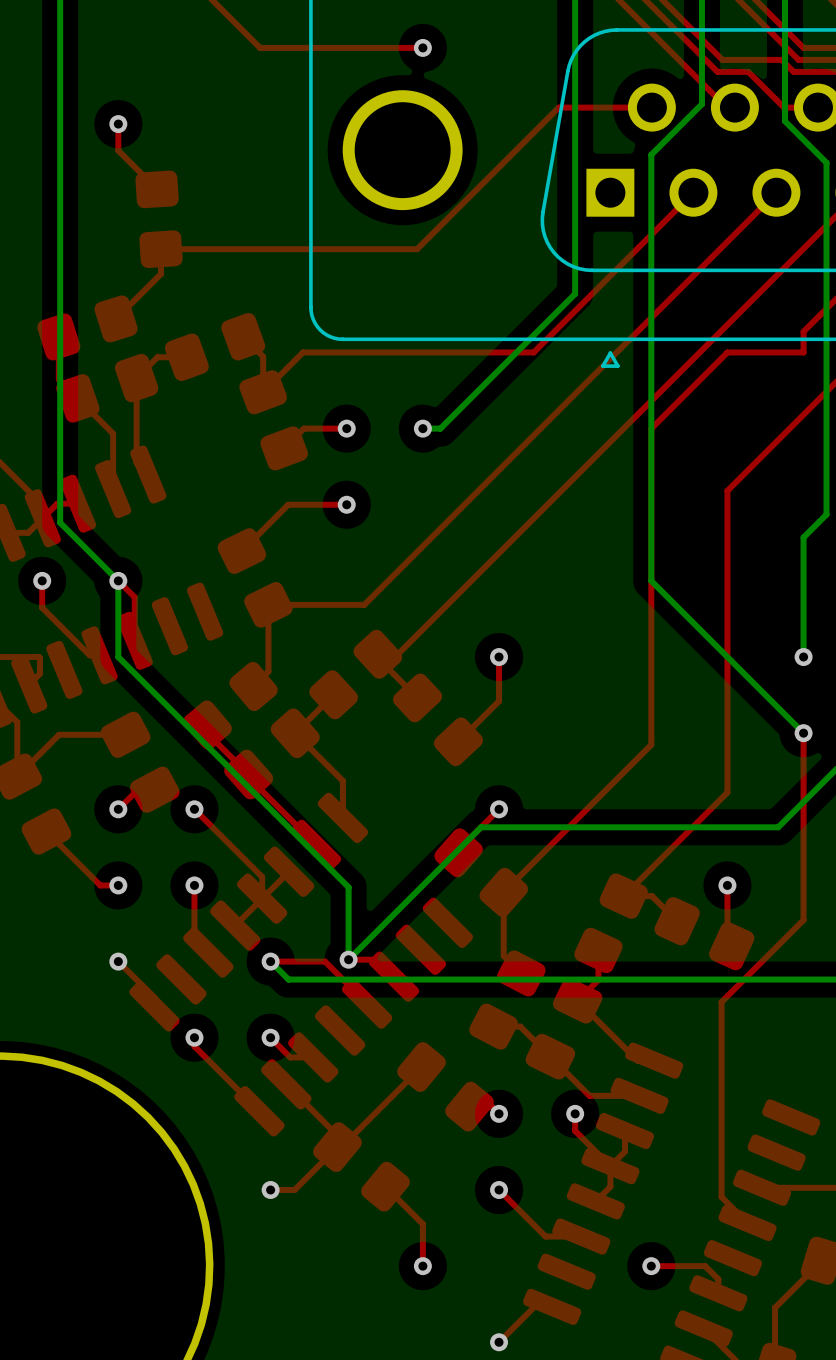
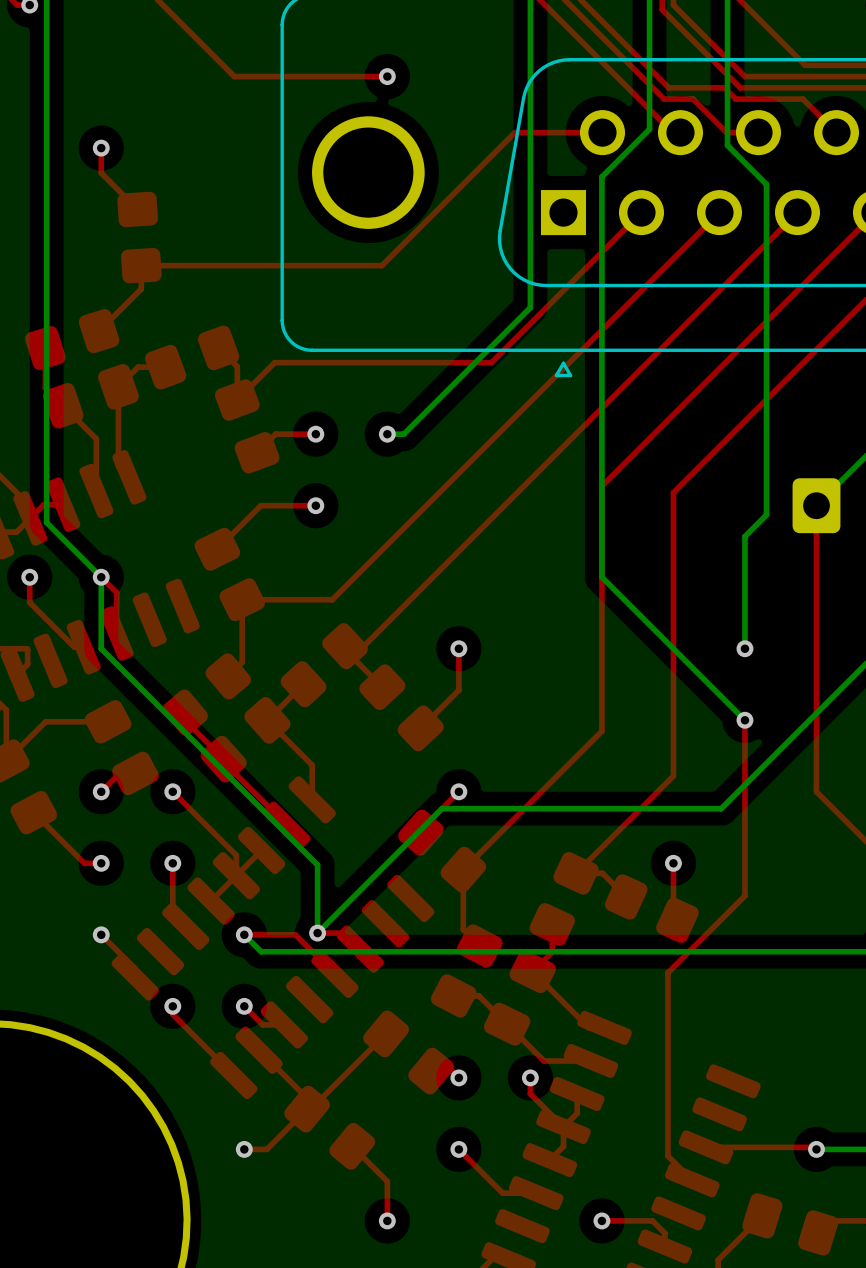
top track: (803, 331) (803, 352) (727, 352) (651, 428) (651, 483) -> (744, 343) (601, 486)

